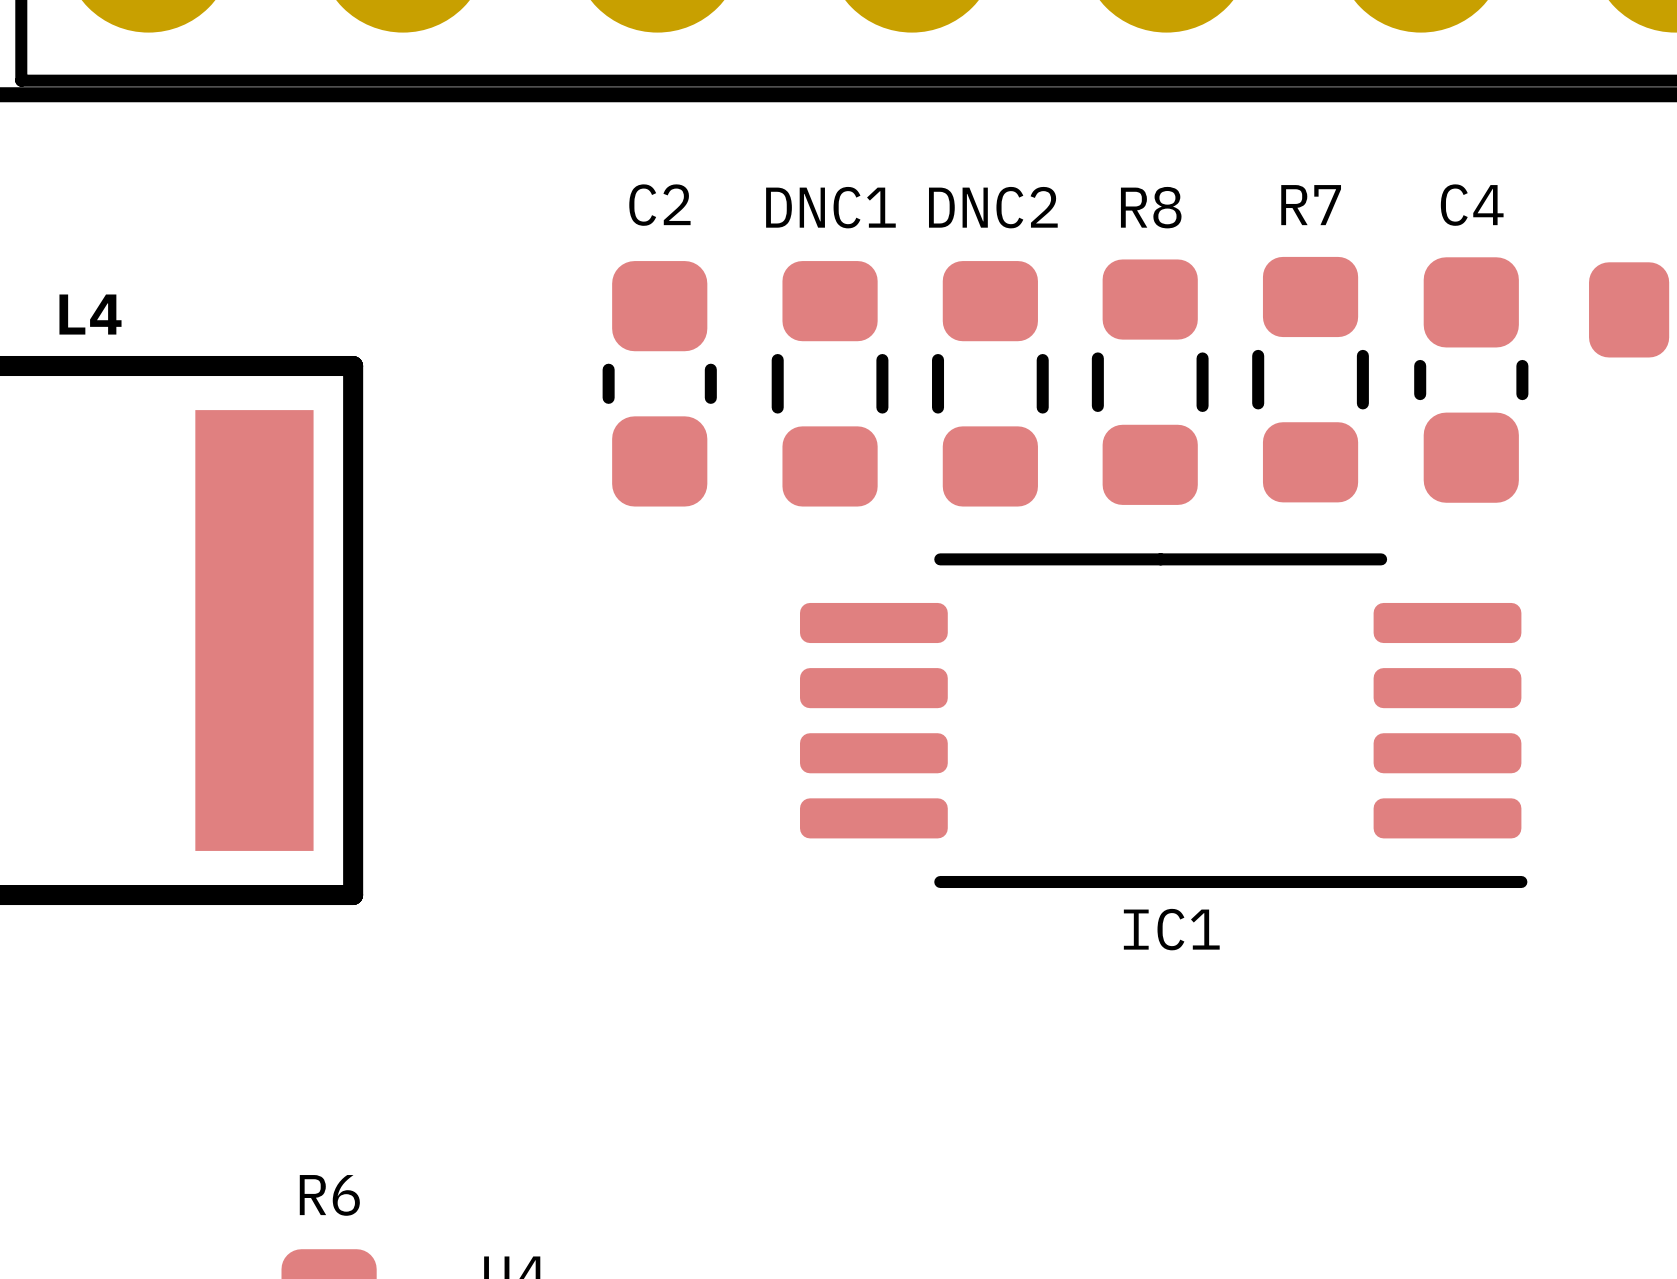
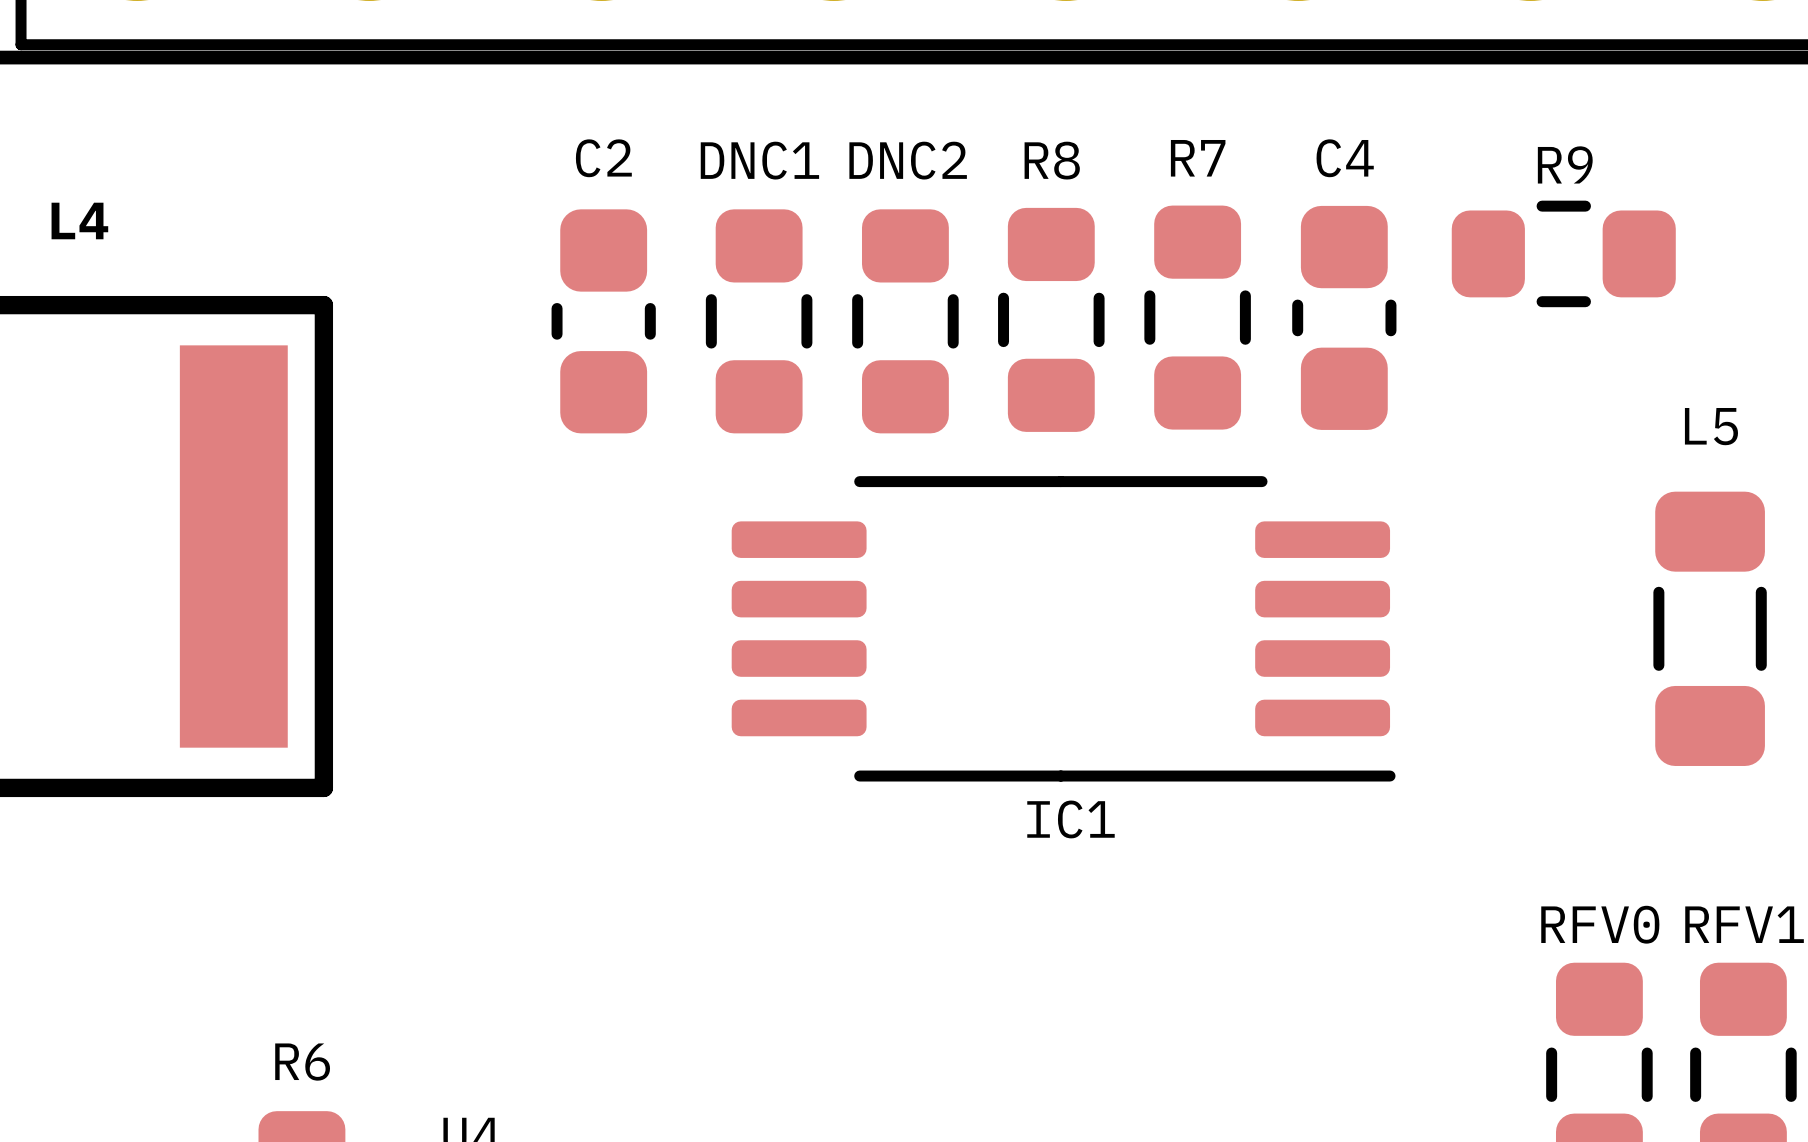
L4 name position: L4 (90, 314) -> L4 (79, 220)

